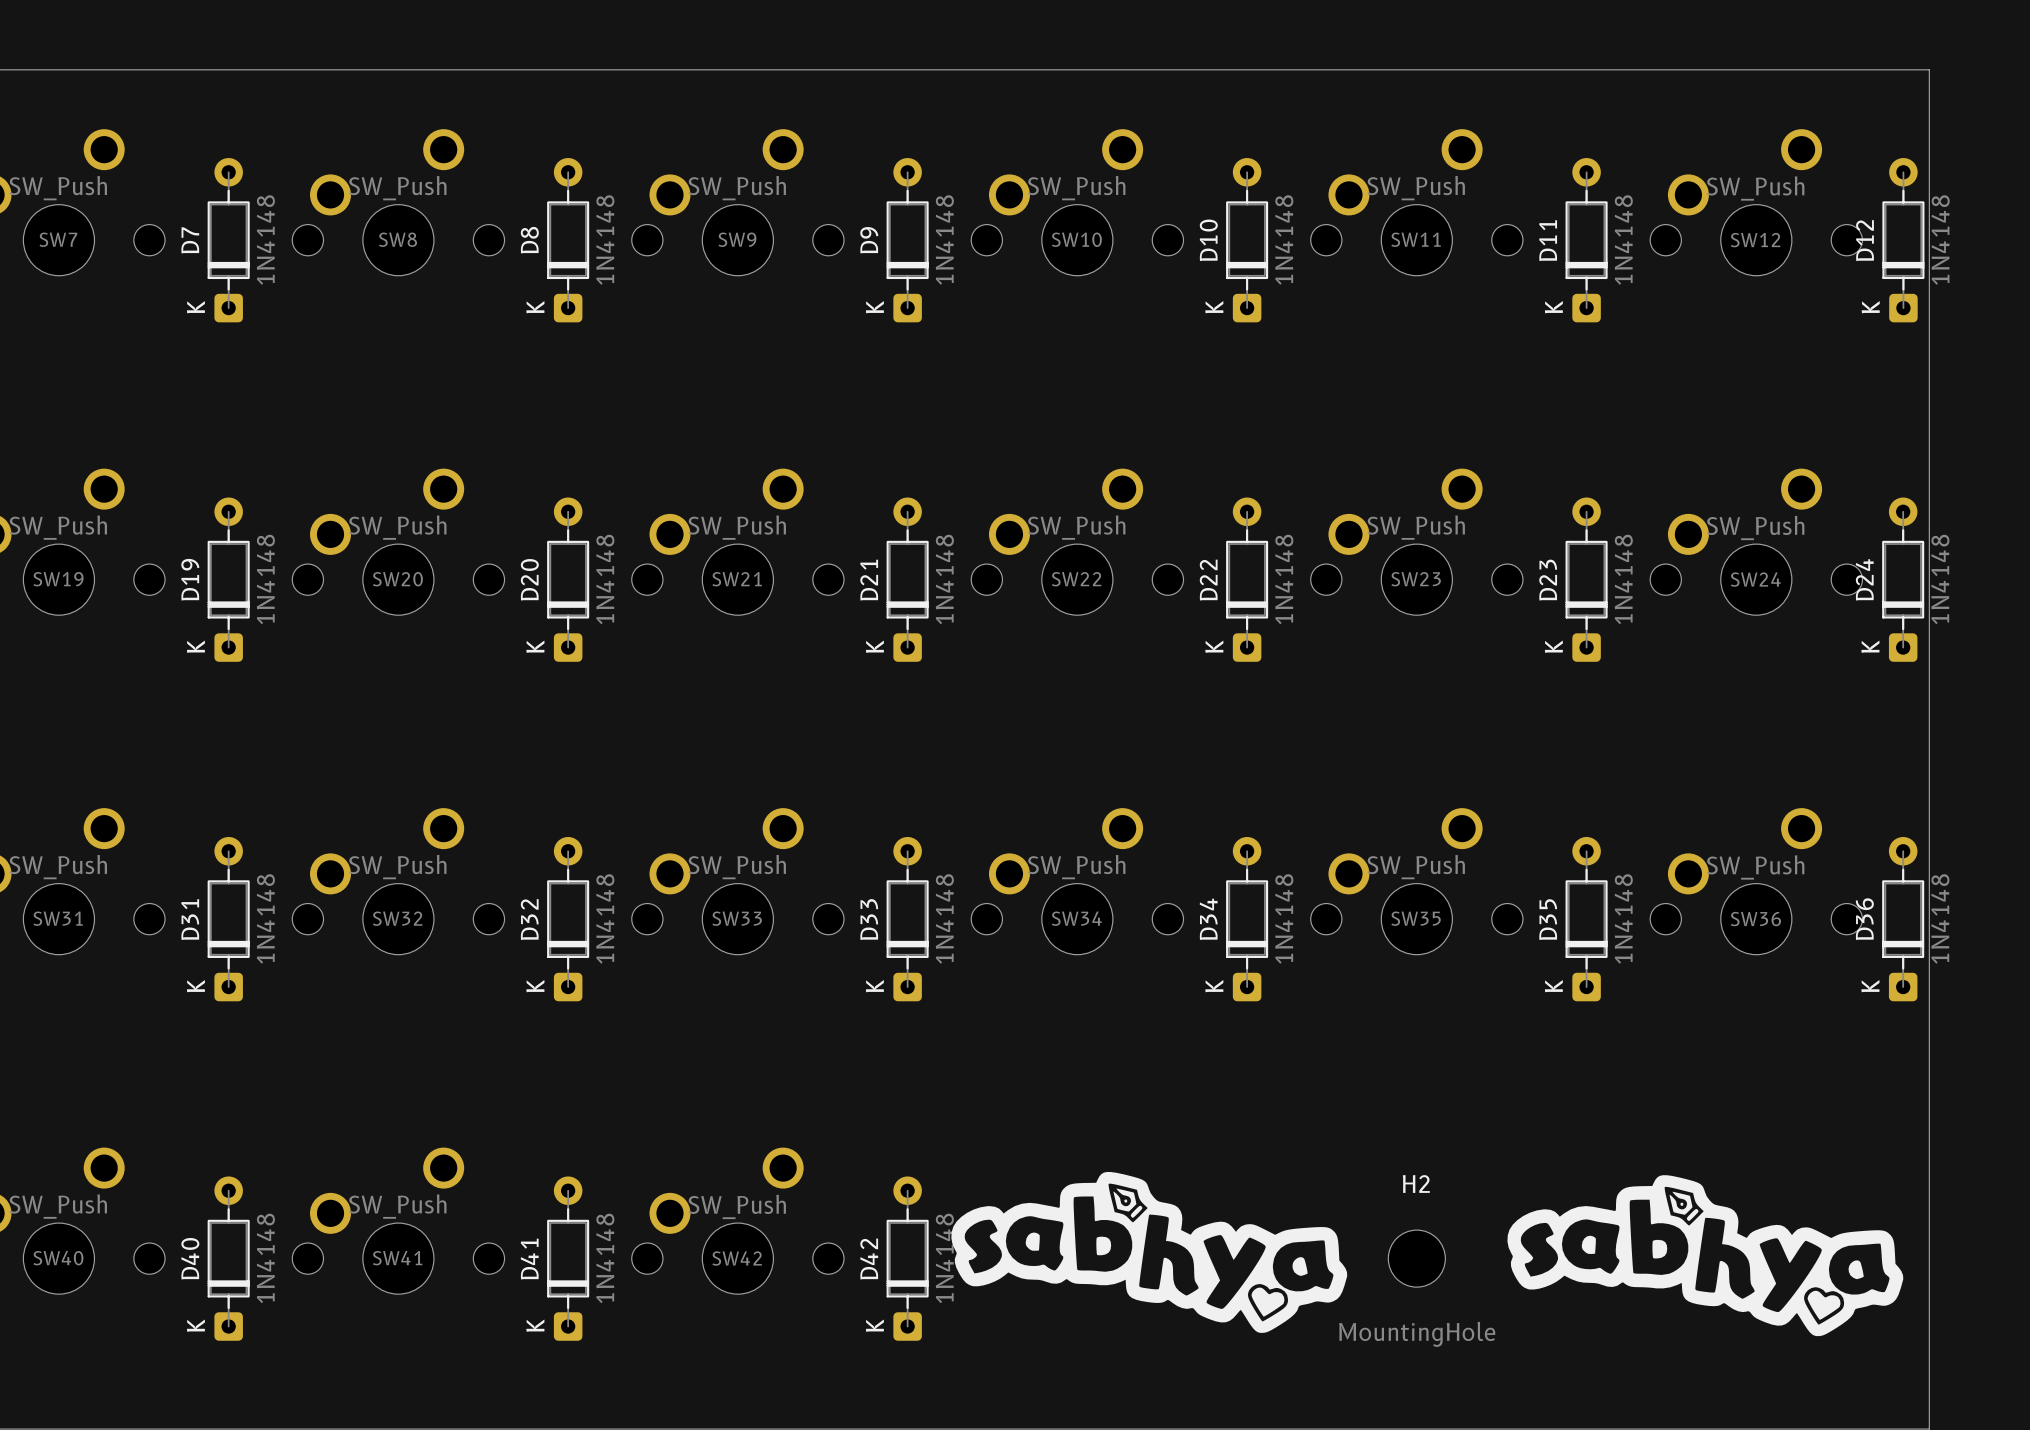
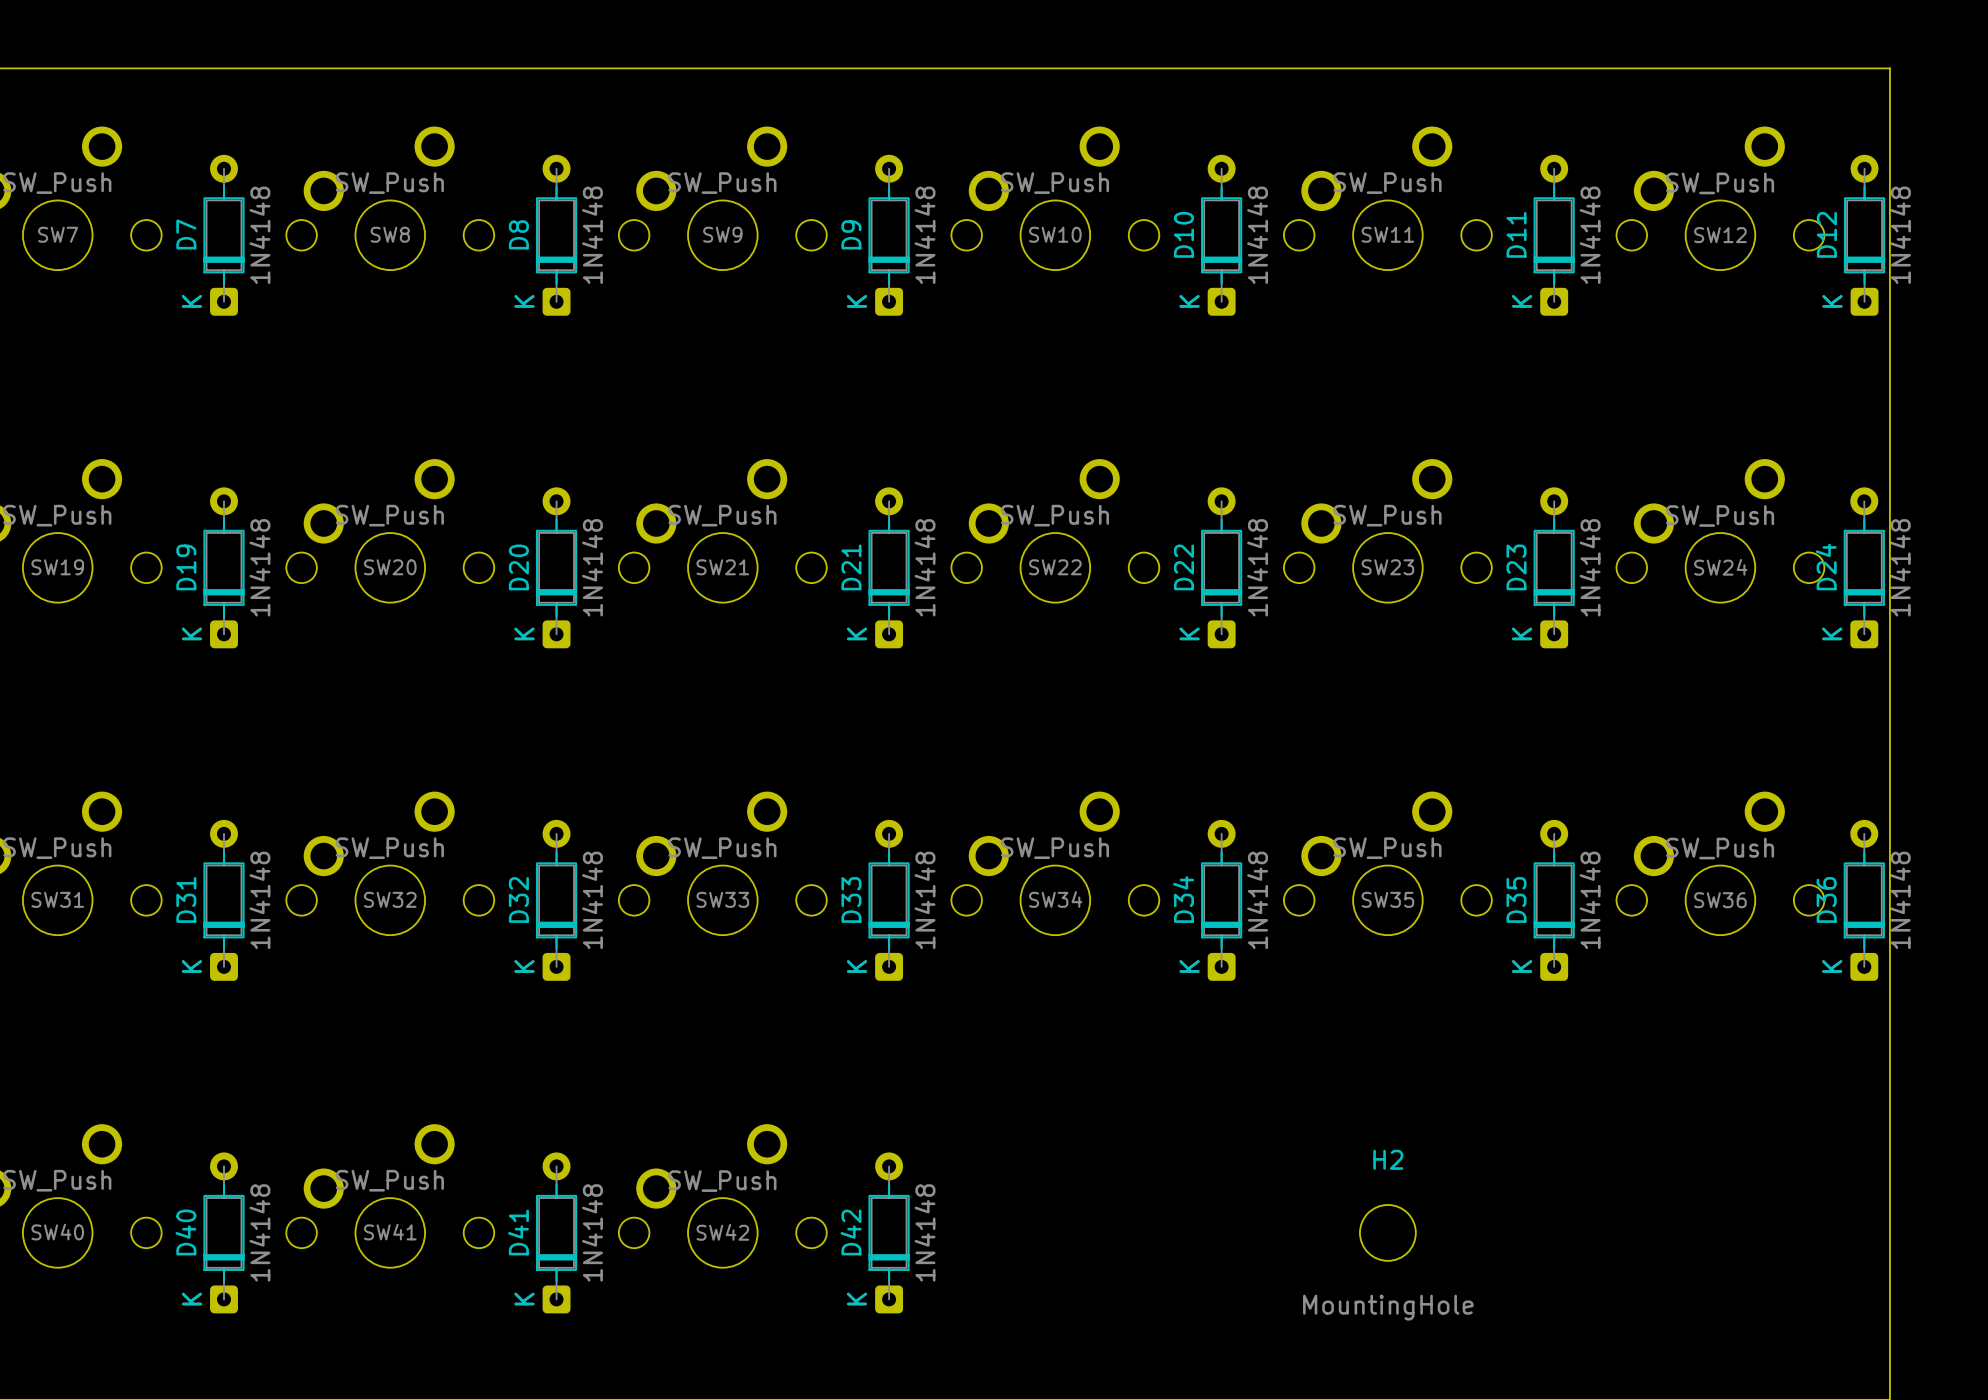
drawing: [951, 1171, 1348, 1333] -> none
drawing: [1507, 1175, 1904, 1337] -> none

